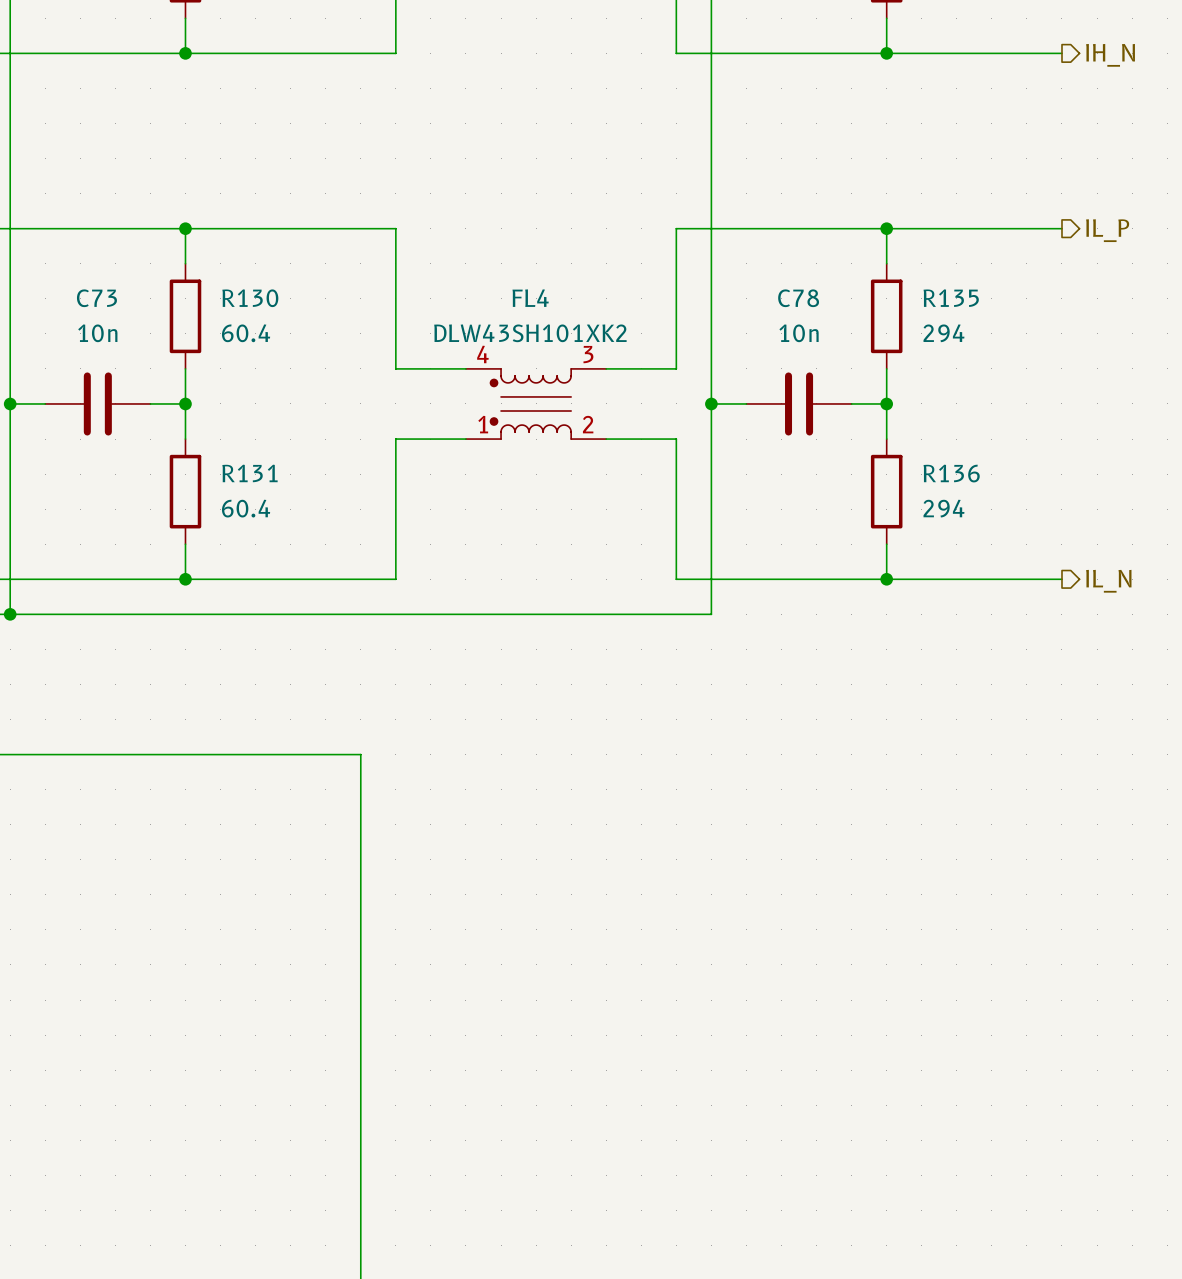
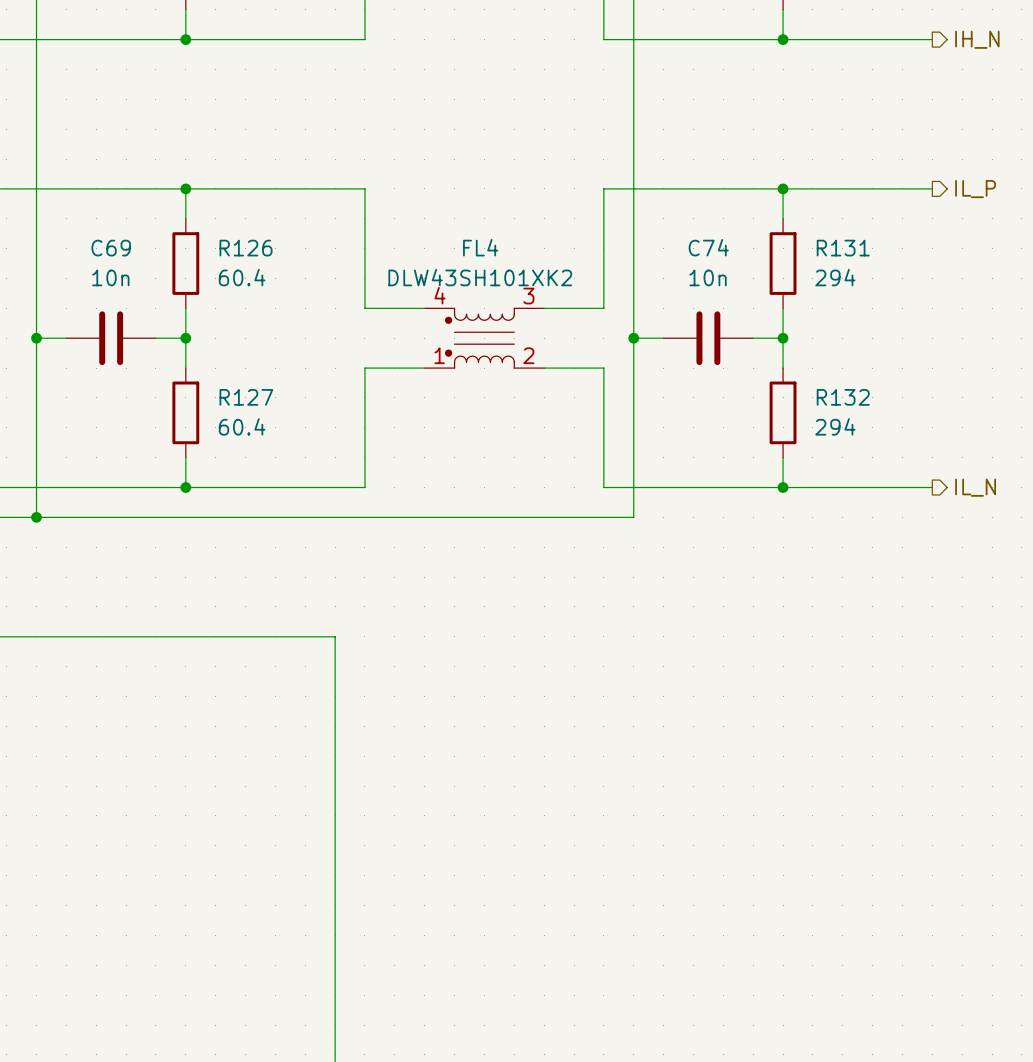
C73 name: C73 (96, 298) -> C69 (111, 248)
R130 name: R130 (250, 298) -> R126 (246, 248)
C78 name: C78 (798, 298) -> C74 (708, 247)
R135 name: R135 (951, 298) -> R131 (843, 248)
R131 name: R131 (249, 473) -> R127 (246, 397)
R136 name: R136 (951, 473) -> R132 (843, 397)

